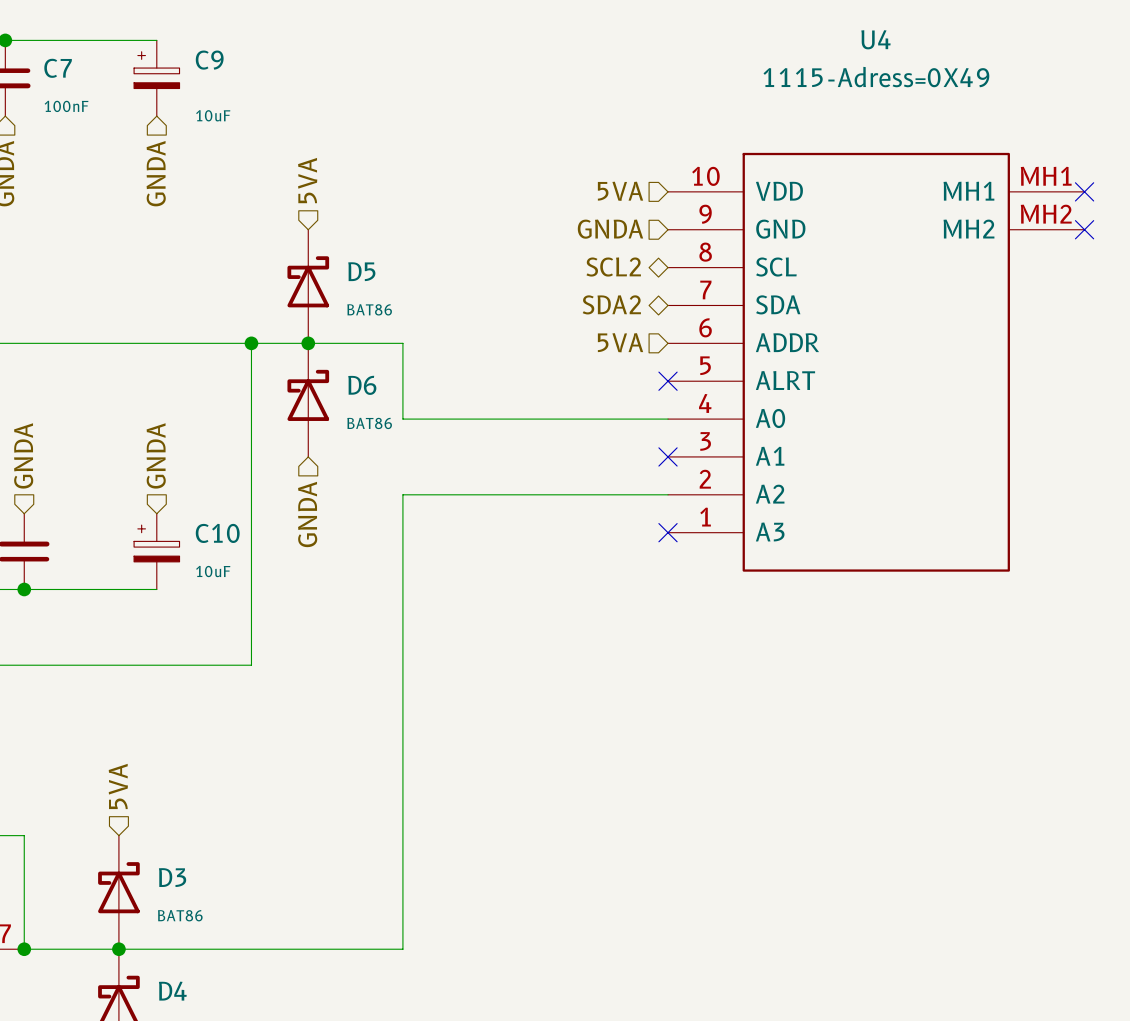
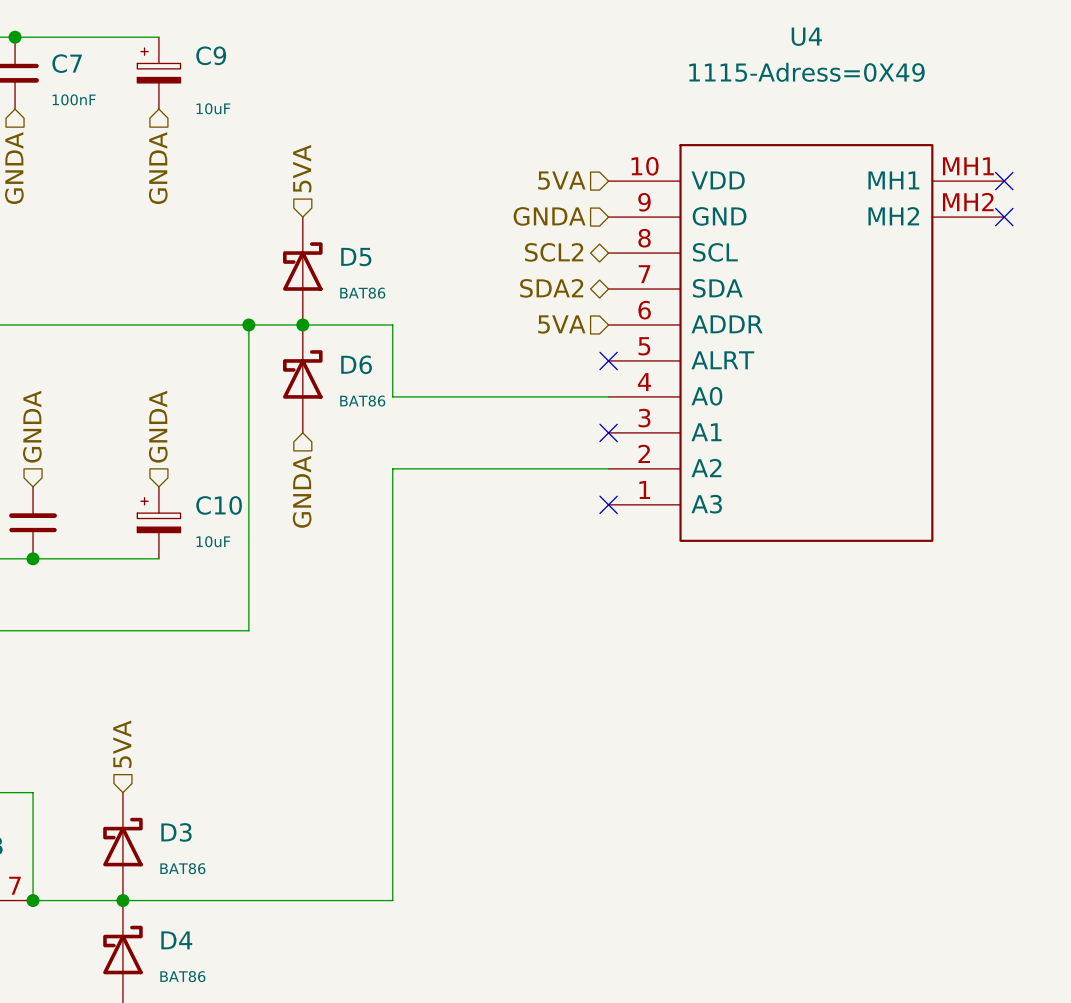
hierarchical label position: 5VA (620, 191) -> 5VA (561, 180)
no-connect mark: none -> (1004, 181)
no-connect mark: (1084, 191) -> none
hierarchical label position: GNDA (610, 229) -> GNDA (549, 216)
no-connect mark: none -> (1004, 217)
no-connect mark: (1084, 229) -> none
hierarchical label position: SCL2 (613, 267) -> SCL2 (554, 252)
hierarchical label position: SDA2 (611, 304) -> SDA2 (551, 288)
hierarchical label position: 5VA (620, 342) -> 5VA (561, 324)
U4 position: (876, 362) -> (806, 342)
no-connect mark position: (668, 381) -> (608, 360)
no-connect mark position: (668, 456) -> (608, 432)
no-connect mark position: (668, 532) -> (608, 504)

